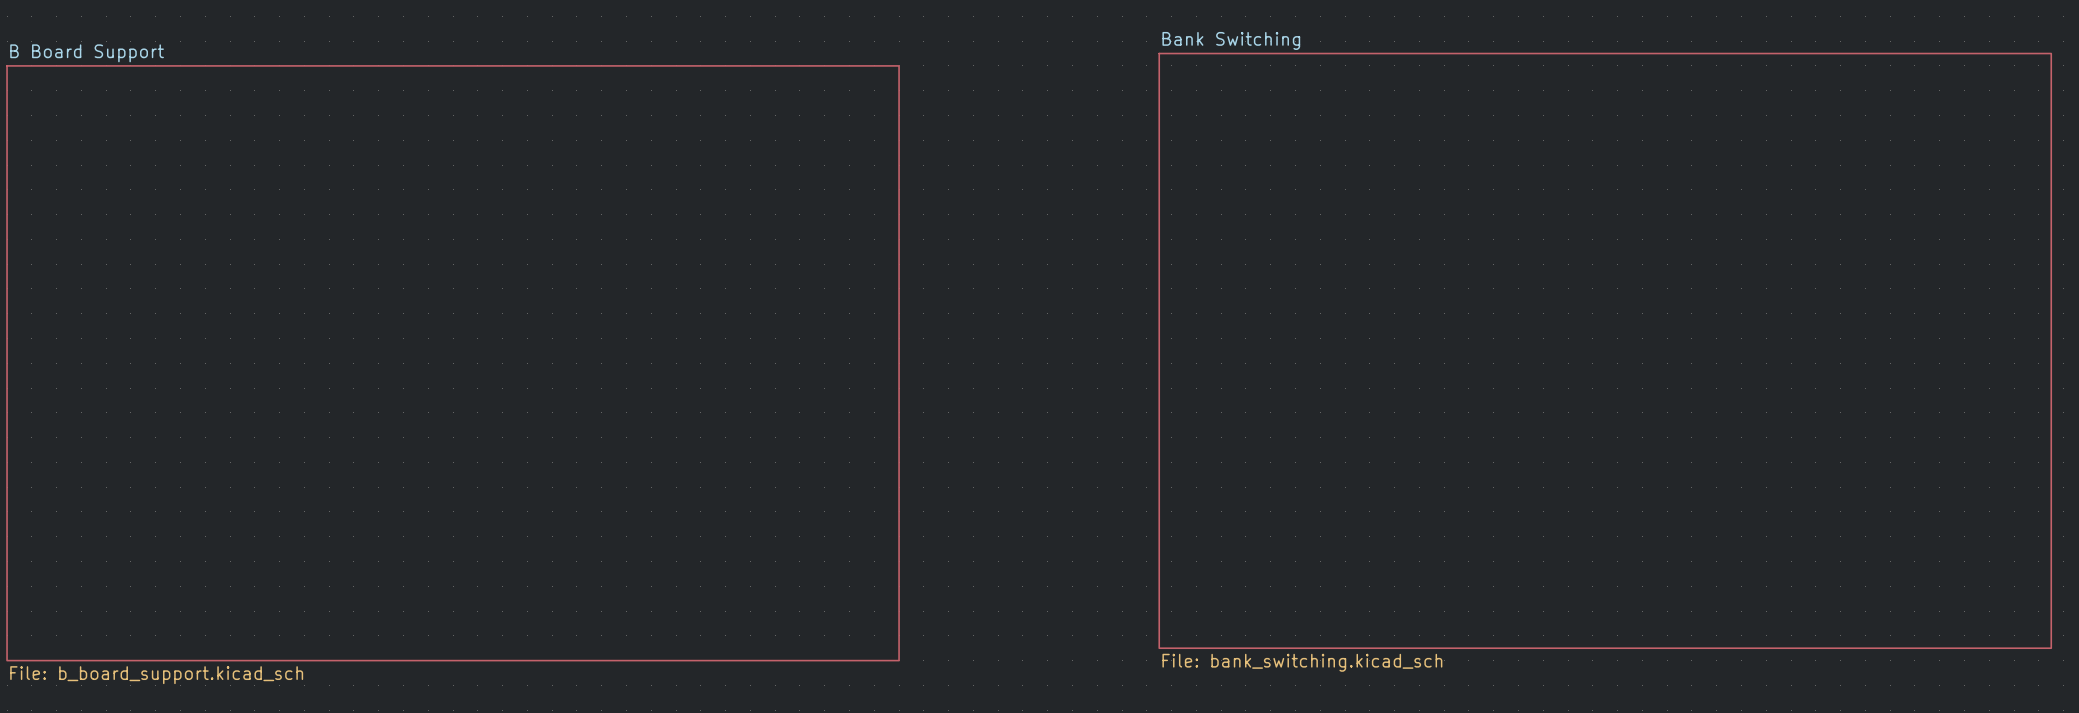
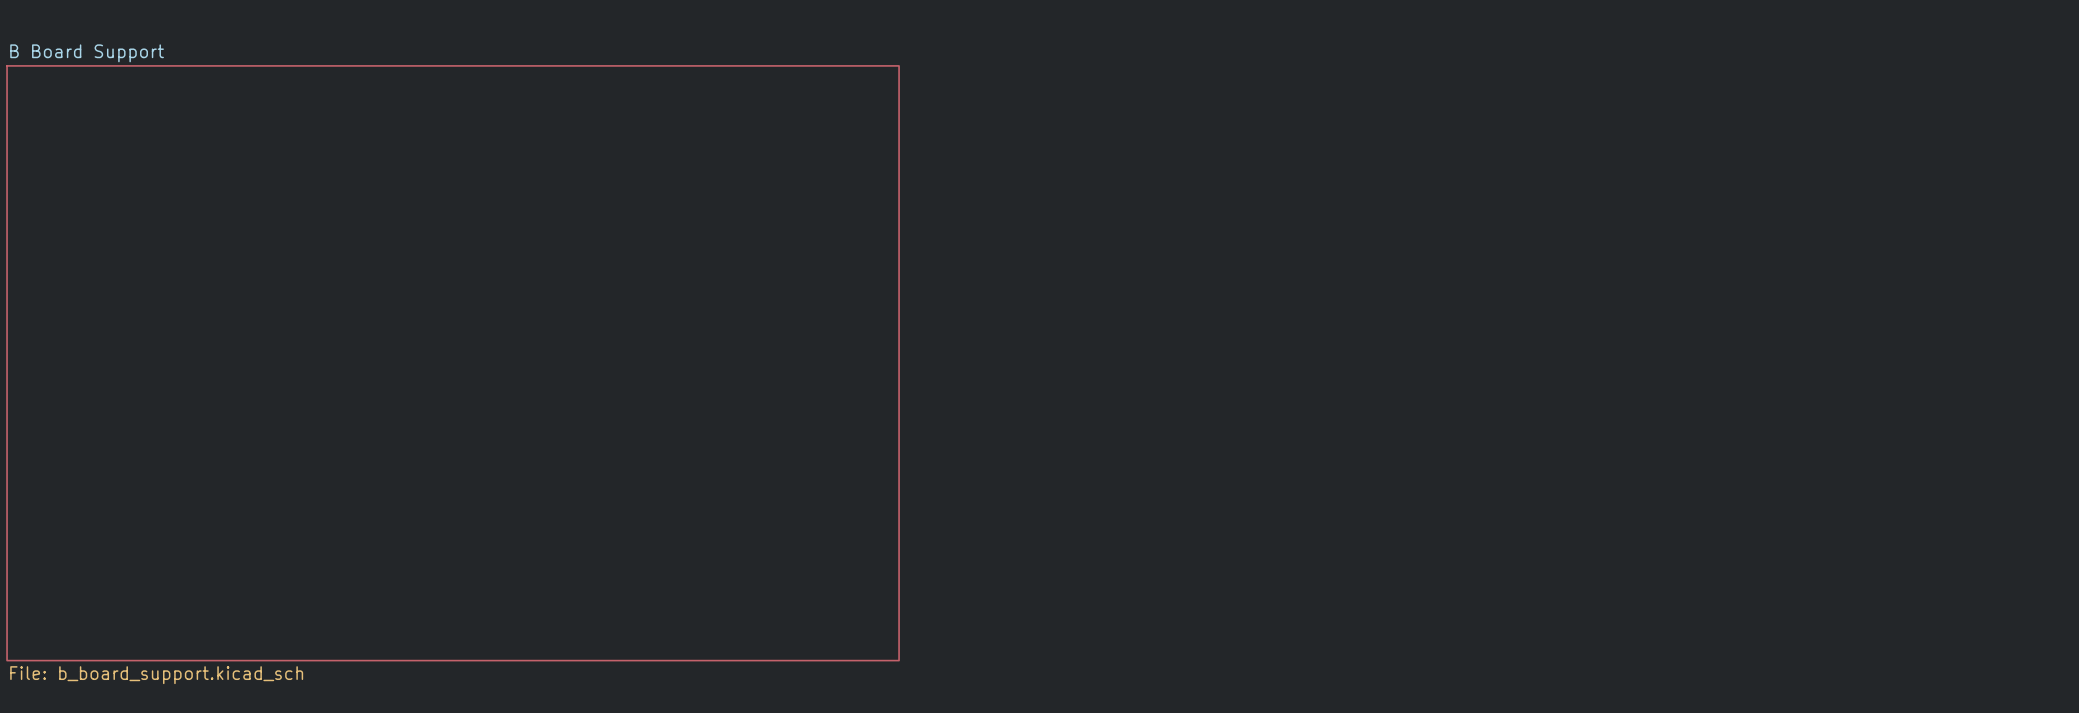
sheet Bank Switching: File: bank_switching.kicad_sch (1605, 350) -> none

